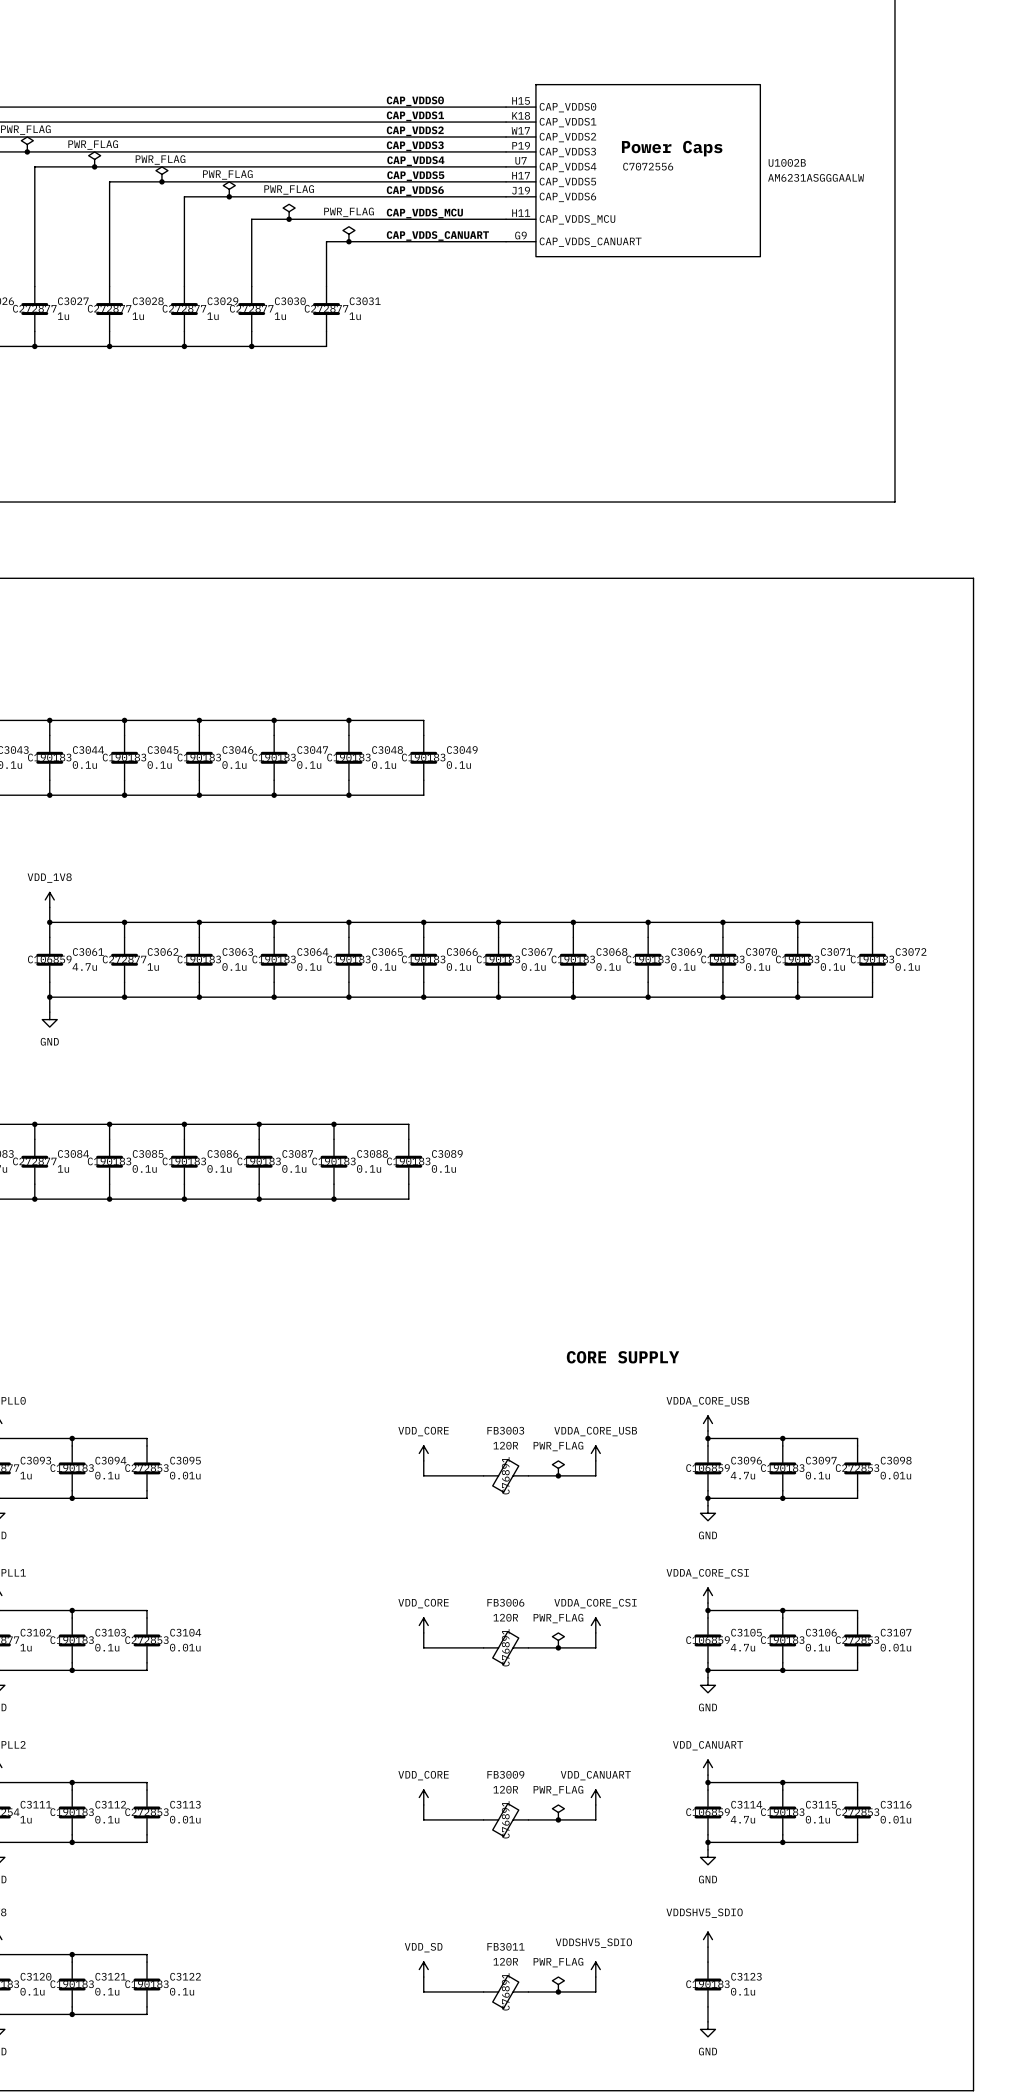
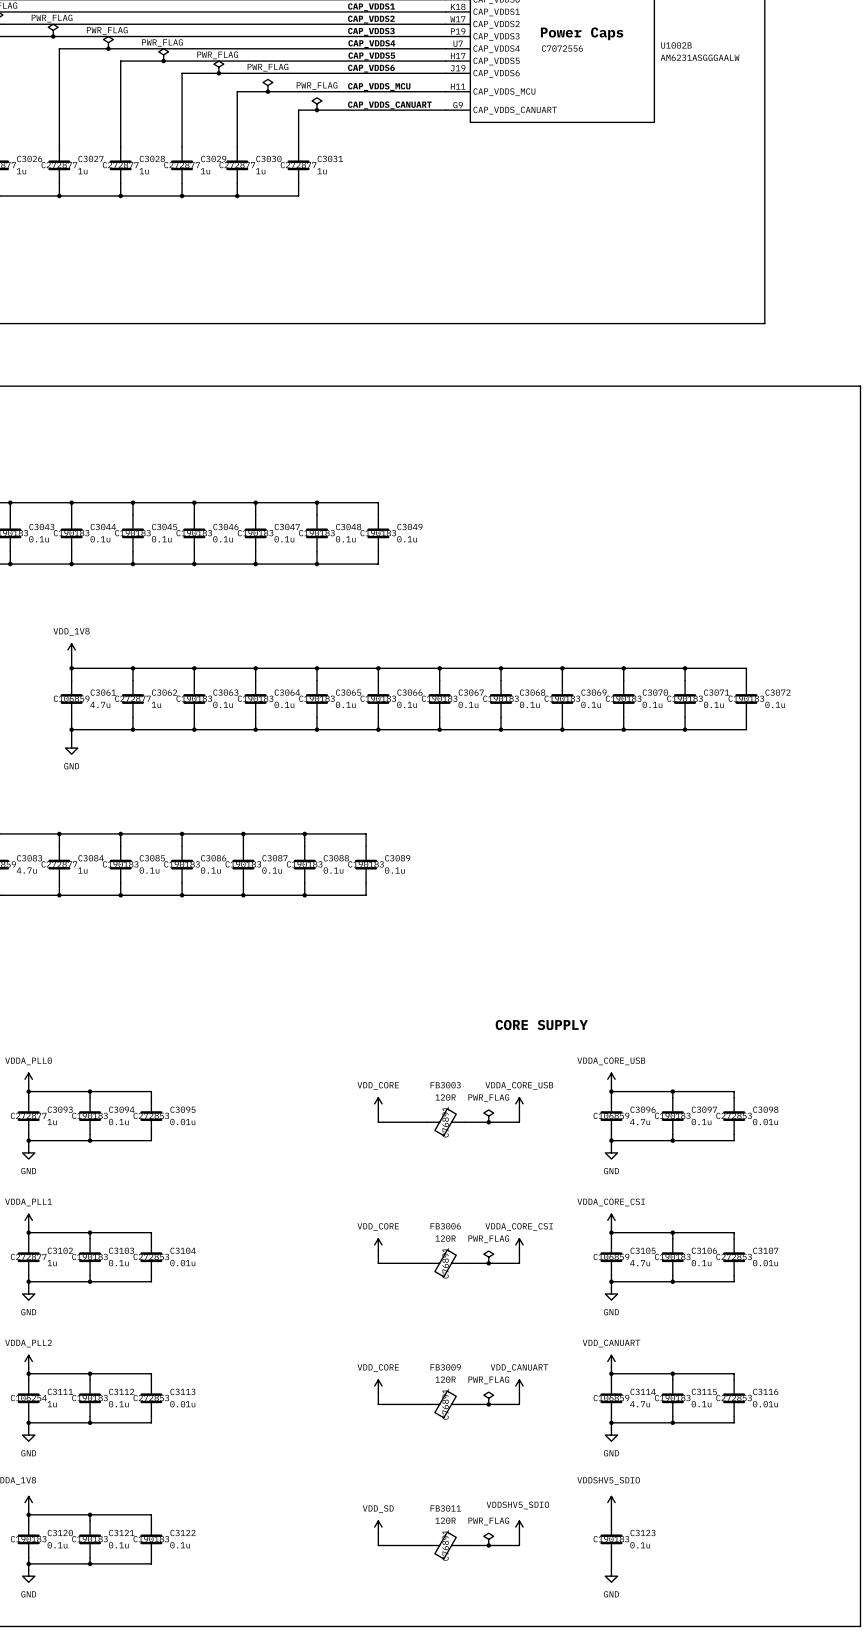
line: (973, 578) (973, 2090) -> (829, 386) (860, 386) (860, 1626) (829, 1626)

